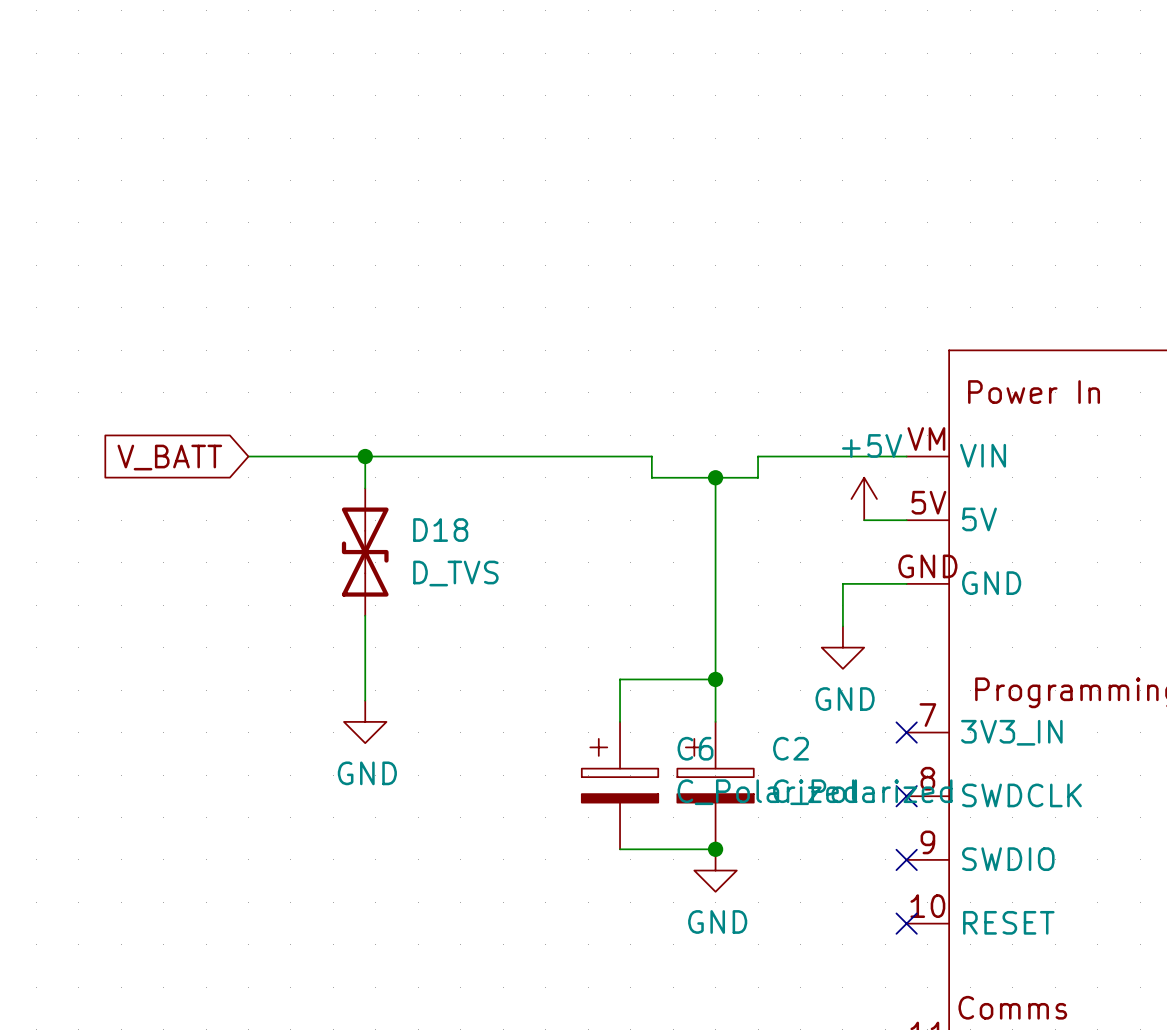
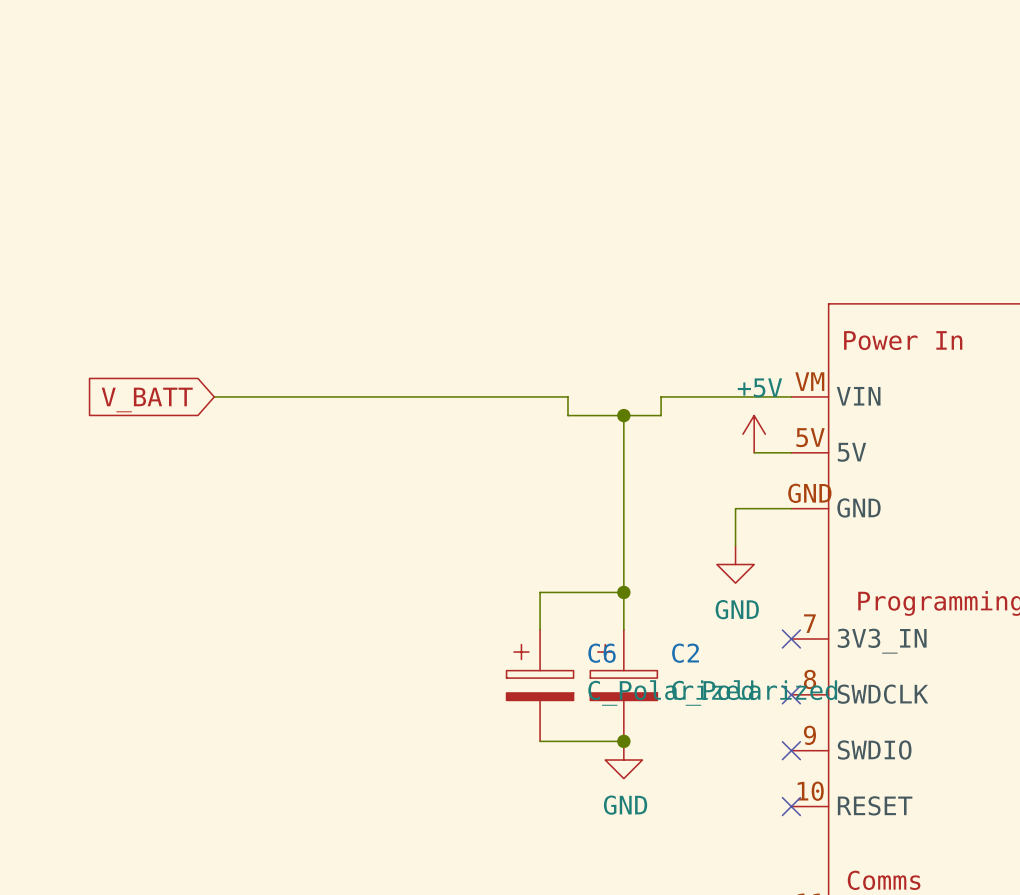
wire: (365, 456) (365, 488) -> none
junction: (365, 456) -> none
D18: D_TVS (365, 552) -> none
wire: (365, 615) (365, 700) -> none
power symbol: GND (365, 721) -> none

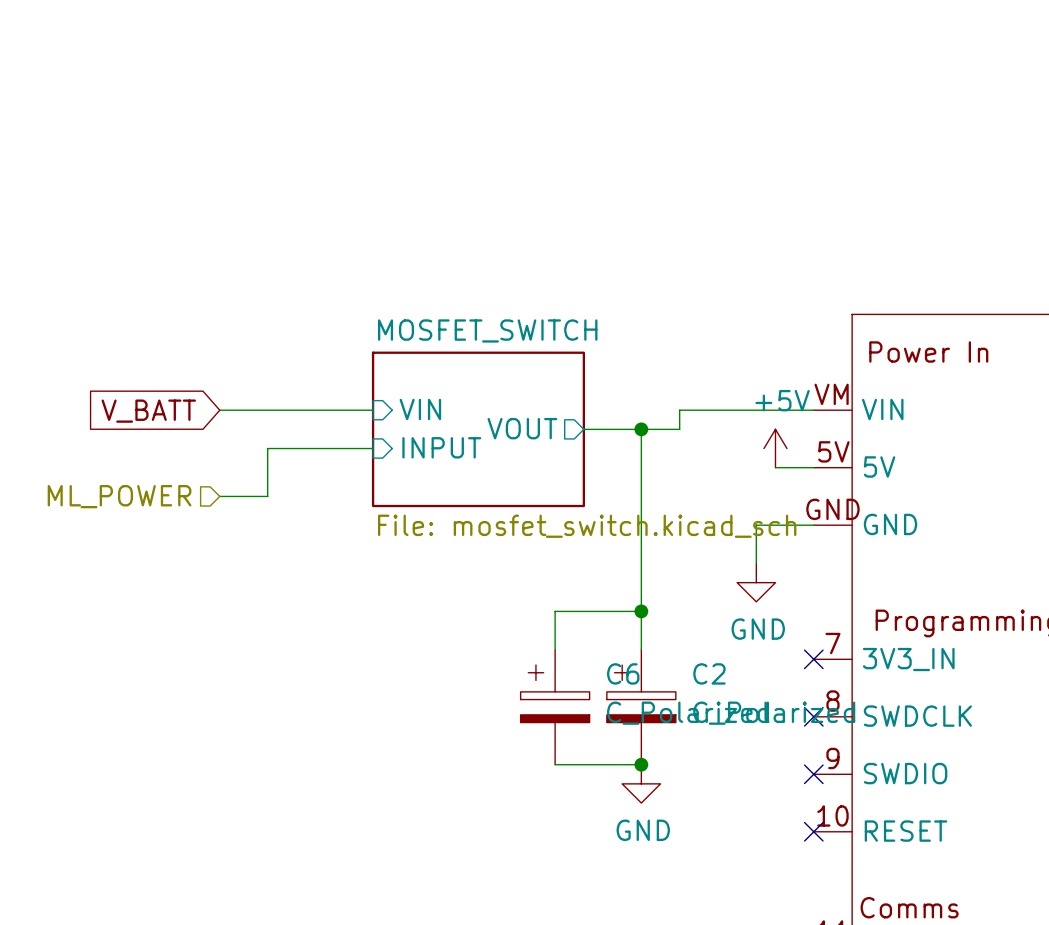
wire: (363, 396) (567, 396) (567, 415) -> none
sheet pin: none -> VIN (420, 409)
sheet pin: none -> VOUT (522, 428)
sheet MOSFET_SWITCH: none -> File: mosfet_switch.kicad_sch (478, 429)
sheet pin: none -> INPUT (441, 447)
wire: none -> (373, 448) (267, 448) (267, 496) (219, 496)
hierarchical label: none -> ML_POWER (119, 496)

